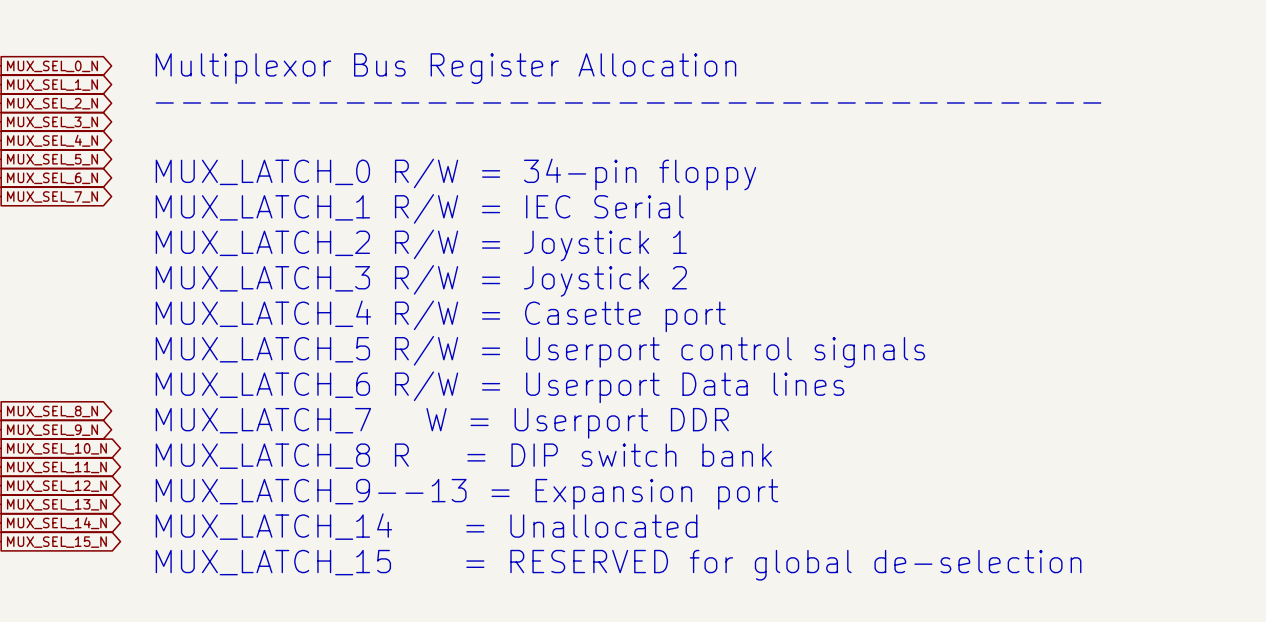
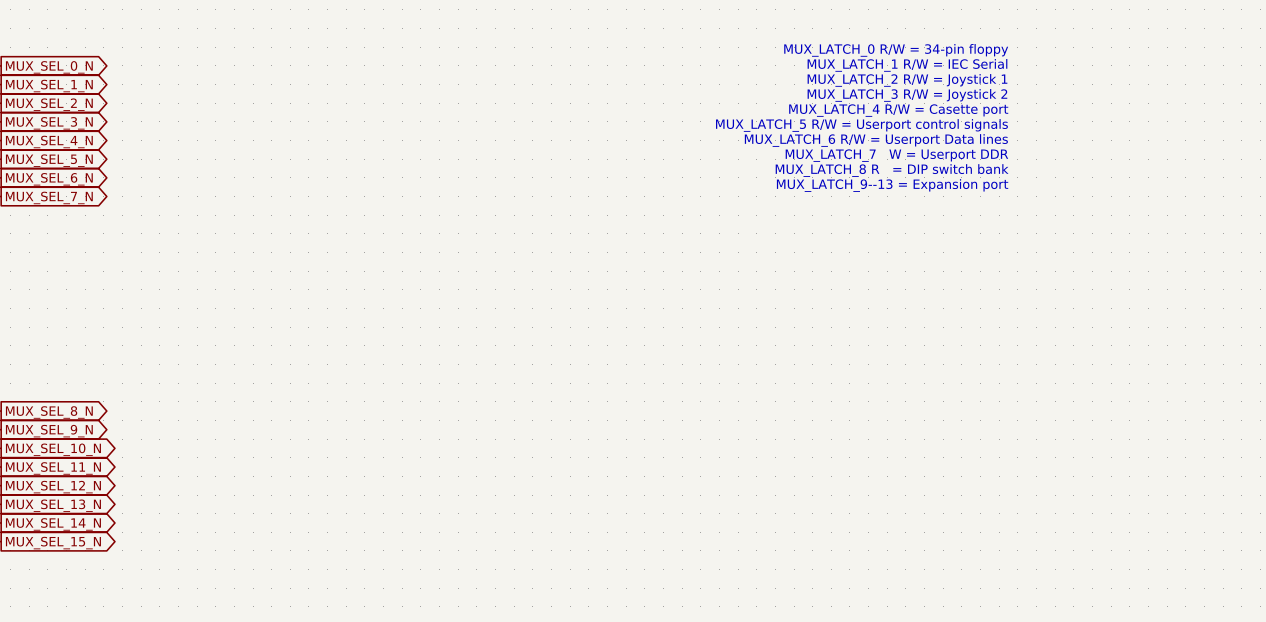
text: none -> MUX_LATCH_0 R/W = 34-pin floppy (896, 50)
text: none -> MUX_LATCH_1 R/W = IEC Serial (907, 65)
text: Multiplexor Bus Register Allocation (445, 68) -> none
text: none -> MUX_LATCH_2 R/W = Joystick 1 (907, 80)
text: none -> MUX_LATCH_3 R/W = Joystick 2 (907, 95)
text: ----------------------------------- (628, 103) -> none
text: none -> MUX_LATCH_4 R/W = Casette port (898, 110)
text: none -> MUX_LATCH_5 R/W = Userport control signals (861, 125)
text: none -> MUX_LATCH_6 R/W = Userport Data lines (876, 140)
text: none -> MUX_LATCH_7 W = Userport DDR (896, 155)
text: none -> MUX_LATCH_8 R = DIP switch bank (892, 170)
text: MUX_LATCH_0 R/W = 34-pin floppy (455, 174) -> none
text: none -> MUX_LATCH_9--13 = Expansion port (892, 185)
text: MUX_LATCH_1 R/W = IEC Serial (419, 208) -> none
text: MUX_LATCH_2 R/W = Joystick 1 (421, 245) -> none
text: MUX_LATCH_3 R/W = Joystick 2 (421, 280) -> none
text: MUX_LATCH_4 R/W = Casette port (440, 316) -> none
text: MUX_LATCH_5 R/W = Userport control signals (540, 351) -> none
text: MUX_LATCH_6 R/W = Userport Data lines (500, 387) -> none
text: MUX_LATCH_7 W = Userport DDR (442, 423) -> none
text: MUX_LATCH_8 R = DIP switch bank (463, 456) -> none
text: MUX_LATCH_9--13 = Expansion port (466, 494) -> none
text: MUX_LATCH_14 = Unallocated (426, 526) -> none
text: MUX_LATCH_15 = RESERVED for global de-selection (618, 565) -> none

